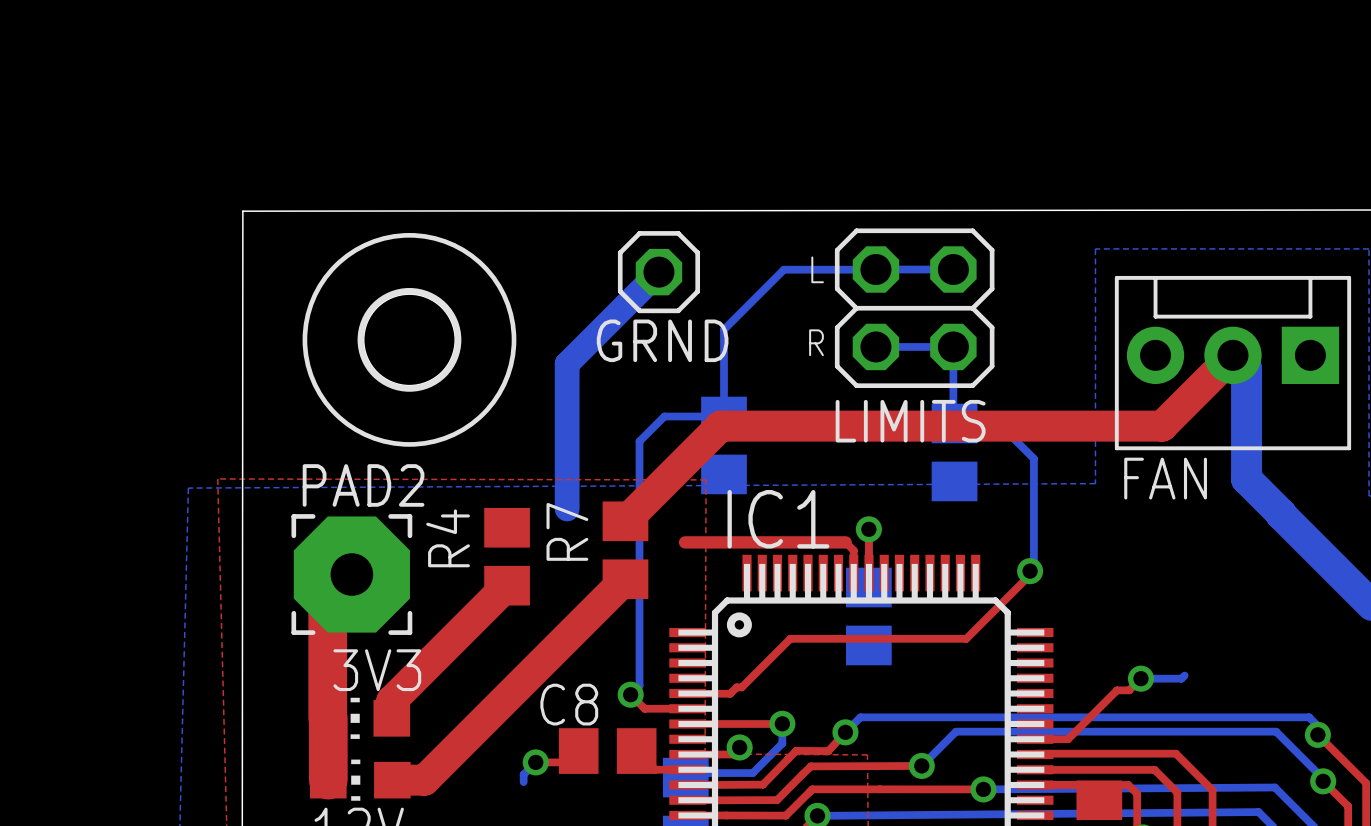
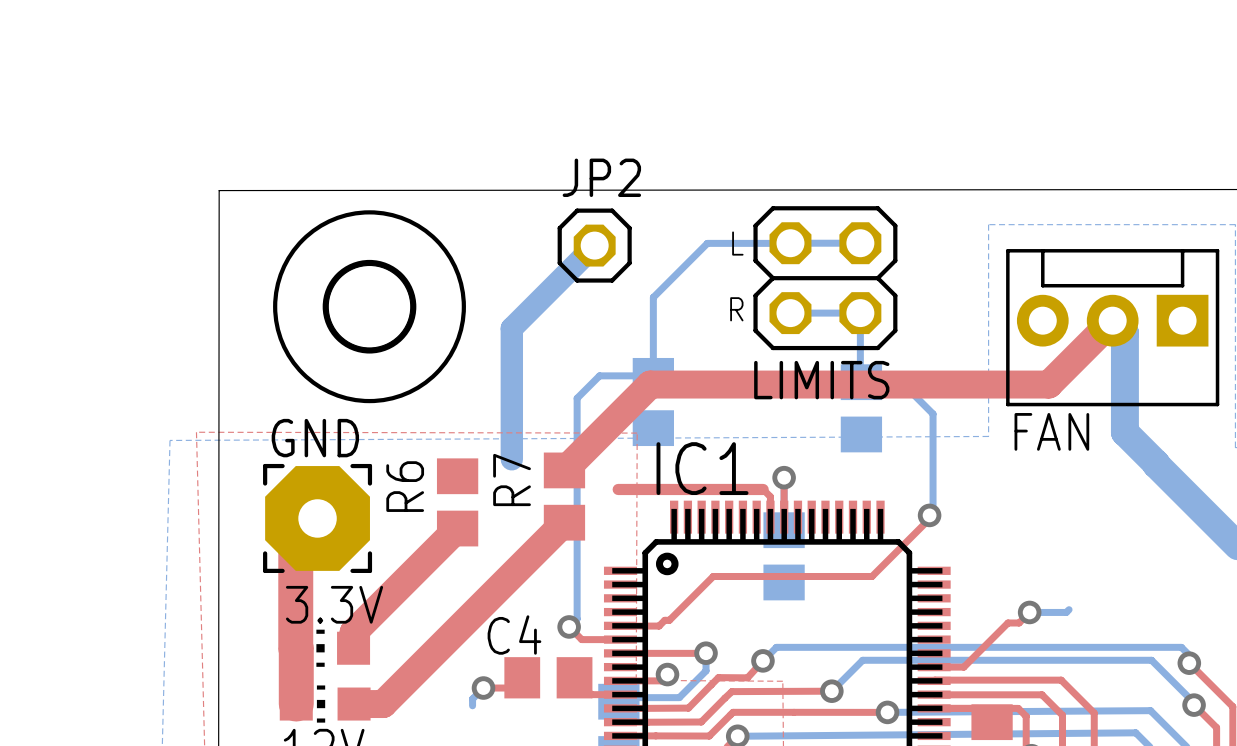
GRND name: GRND (662, 340) -> JP2 (601, 177)
PAD2 name: PAD2 (363, 485) -> GND (315, 438)
R4 name: R4 (448, 538) -> R6 (405, 486)
3V3 name: 3V3 (377, 670) -> 3.3V (334, 604)
C8 name: C8 (569, 704) -> C4 (514, 635)

